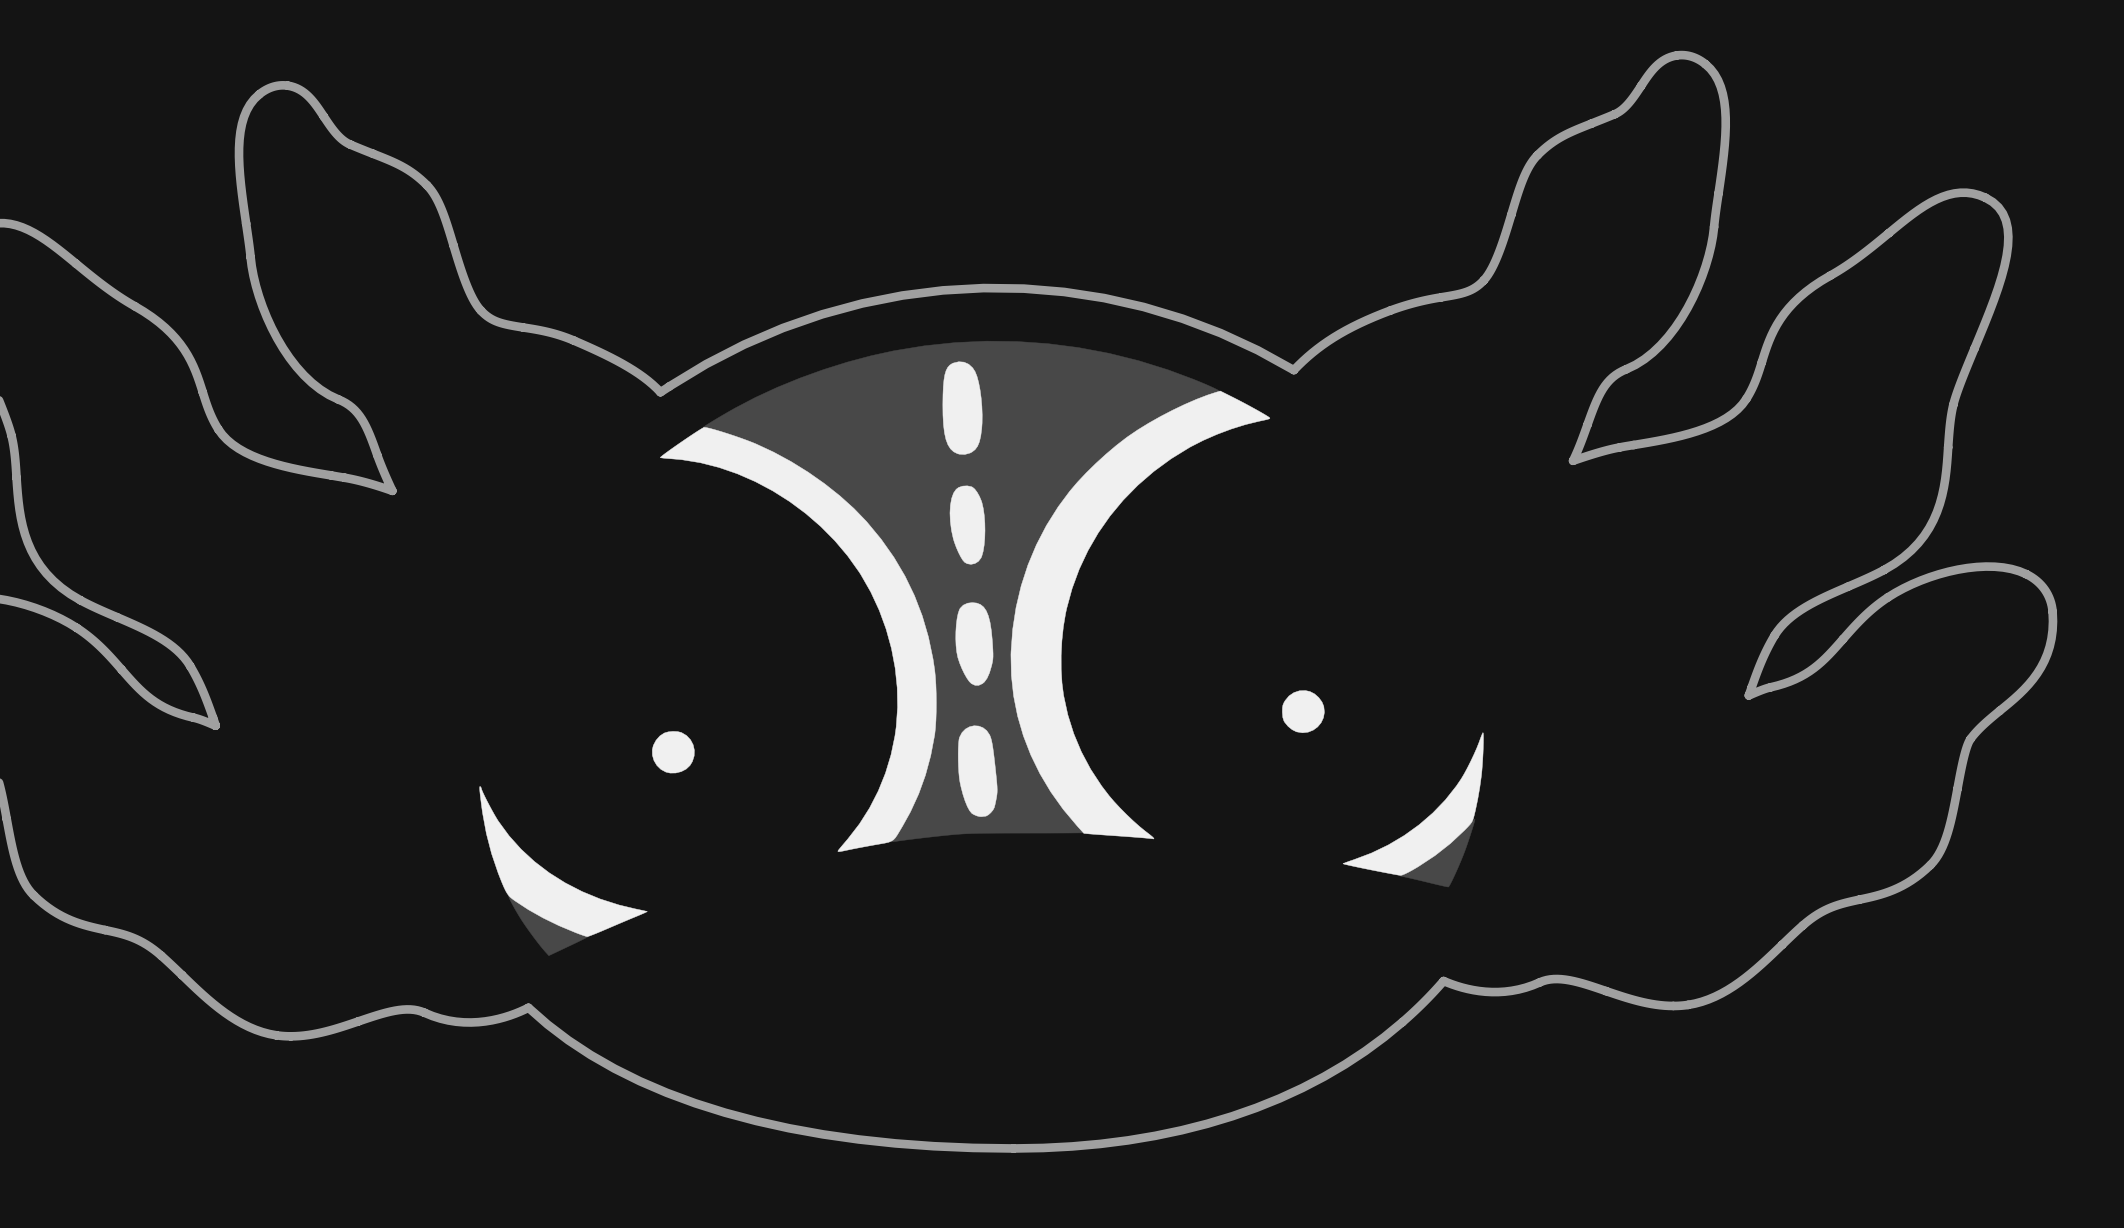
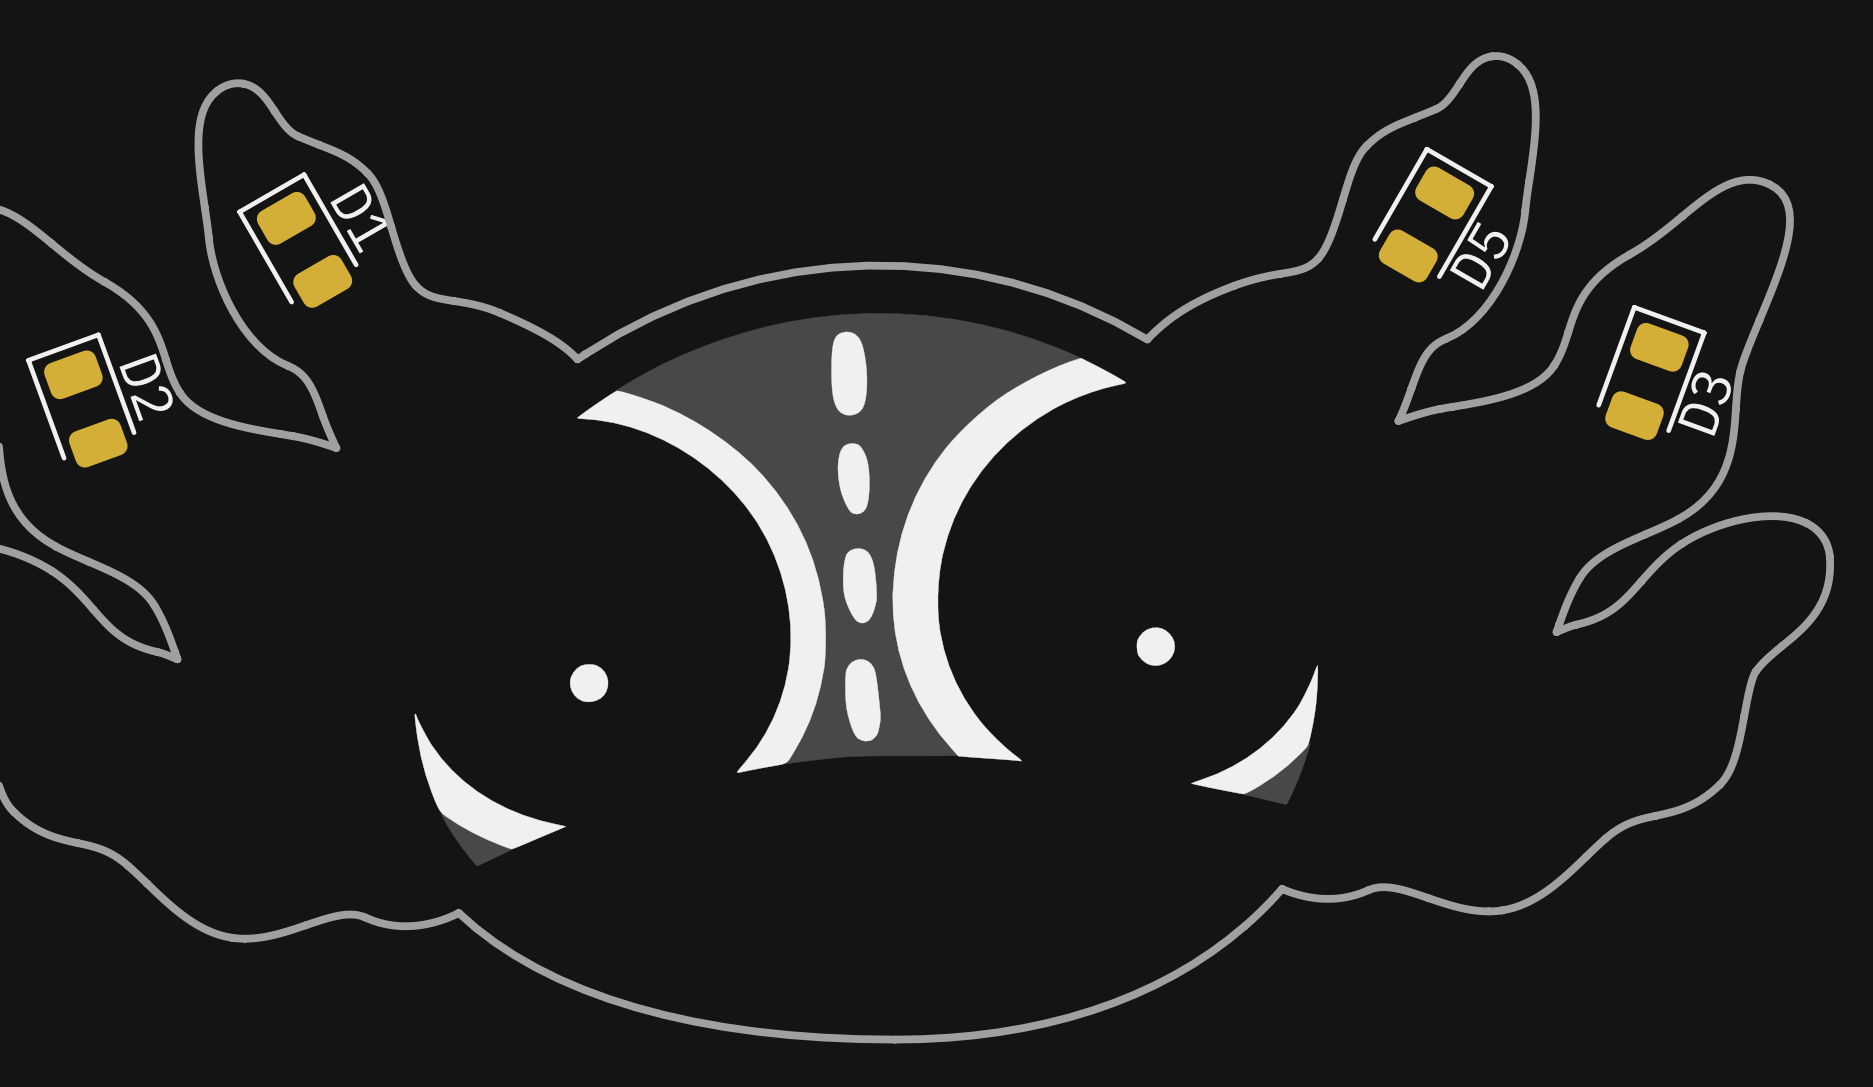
D5: none -> (1433, 214)
D1: none -> (297, 240)
D3: none -> (1651, 372)
D2: none -> (81, 400)

